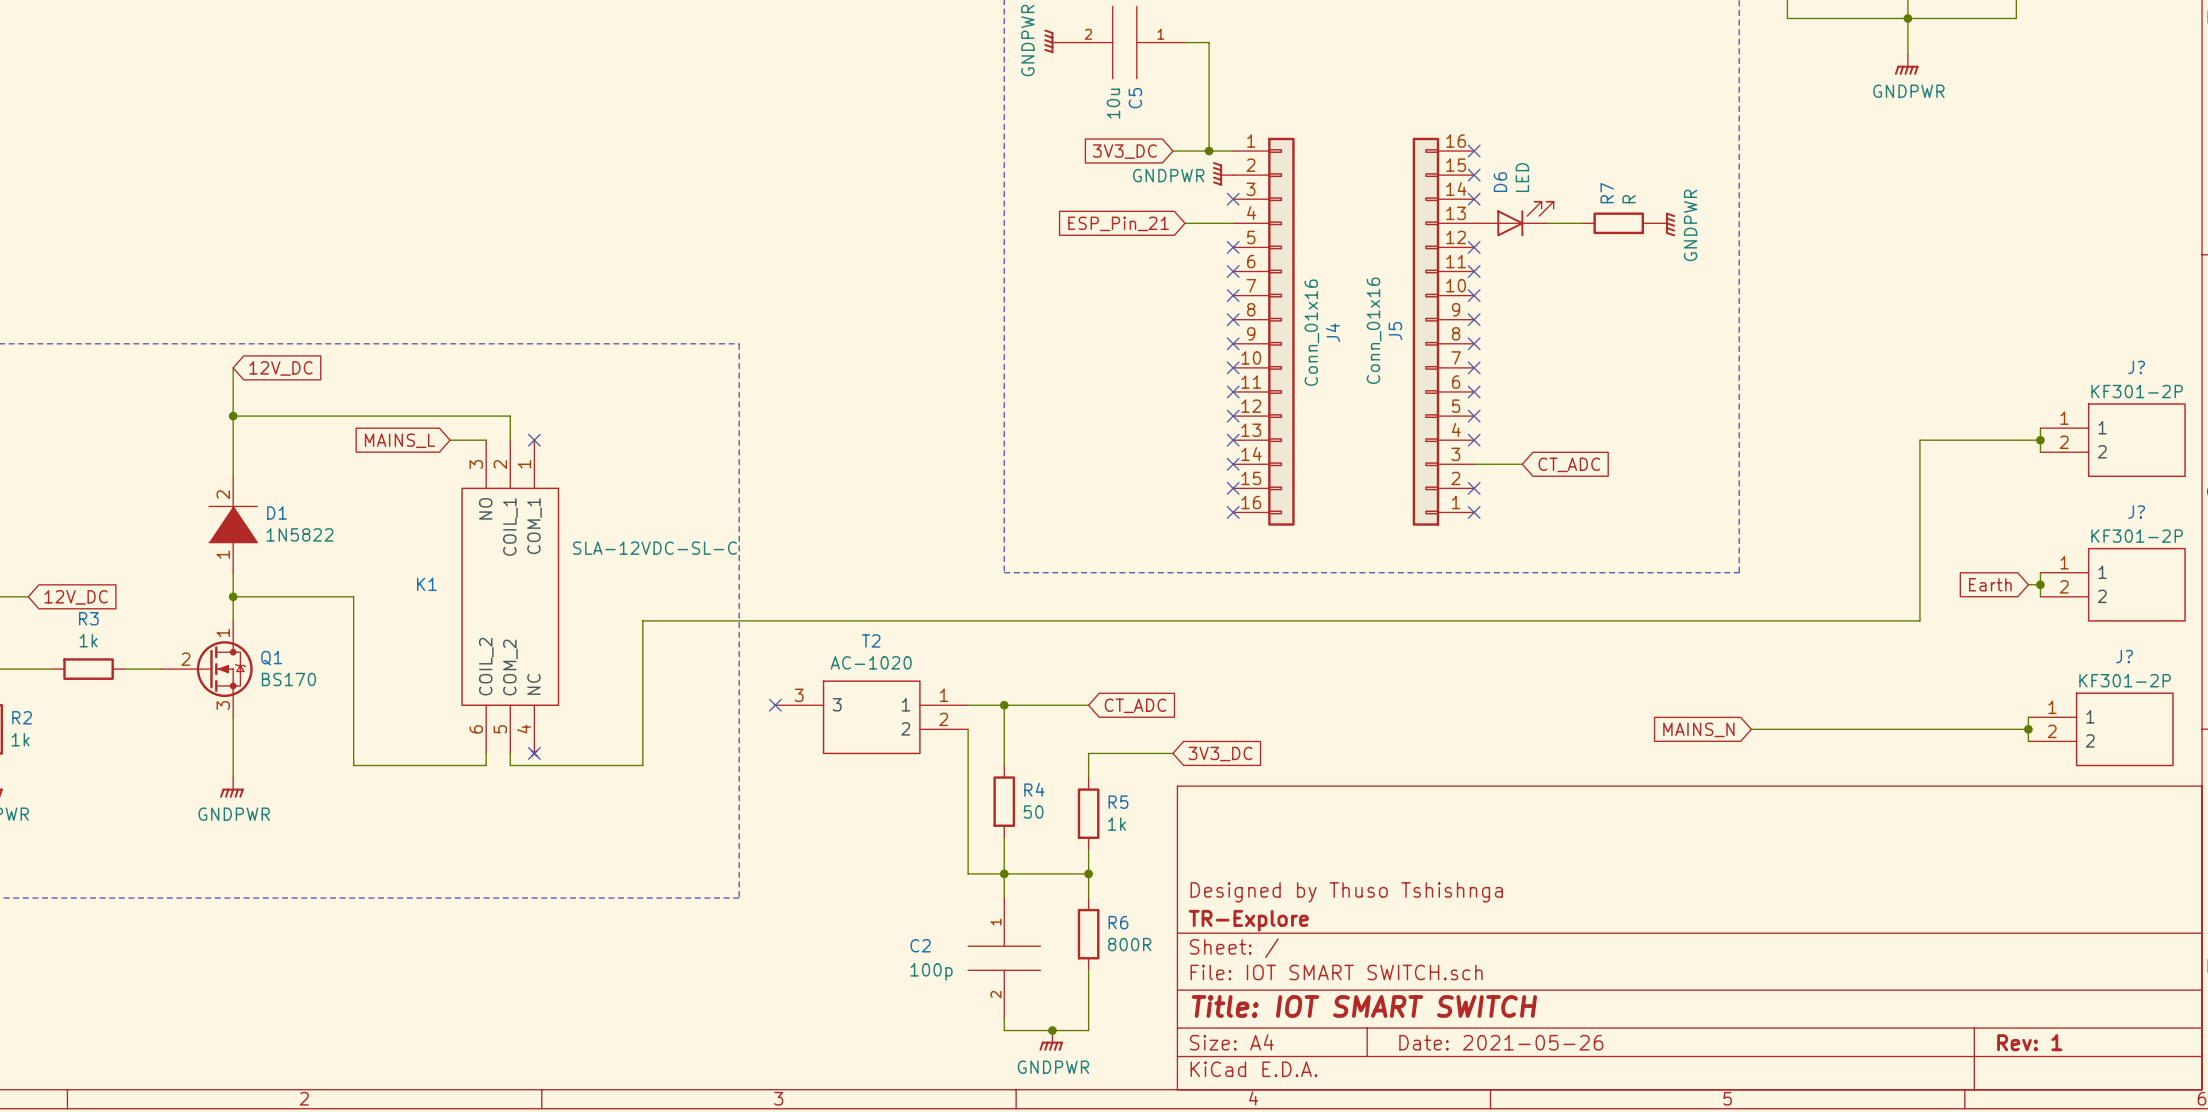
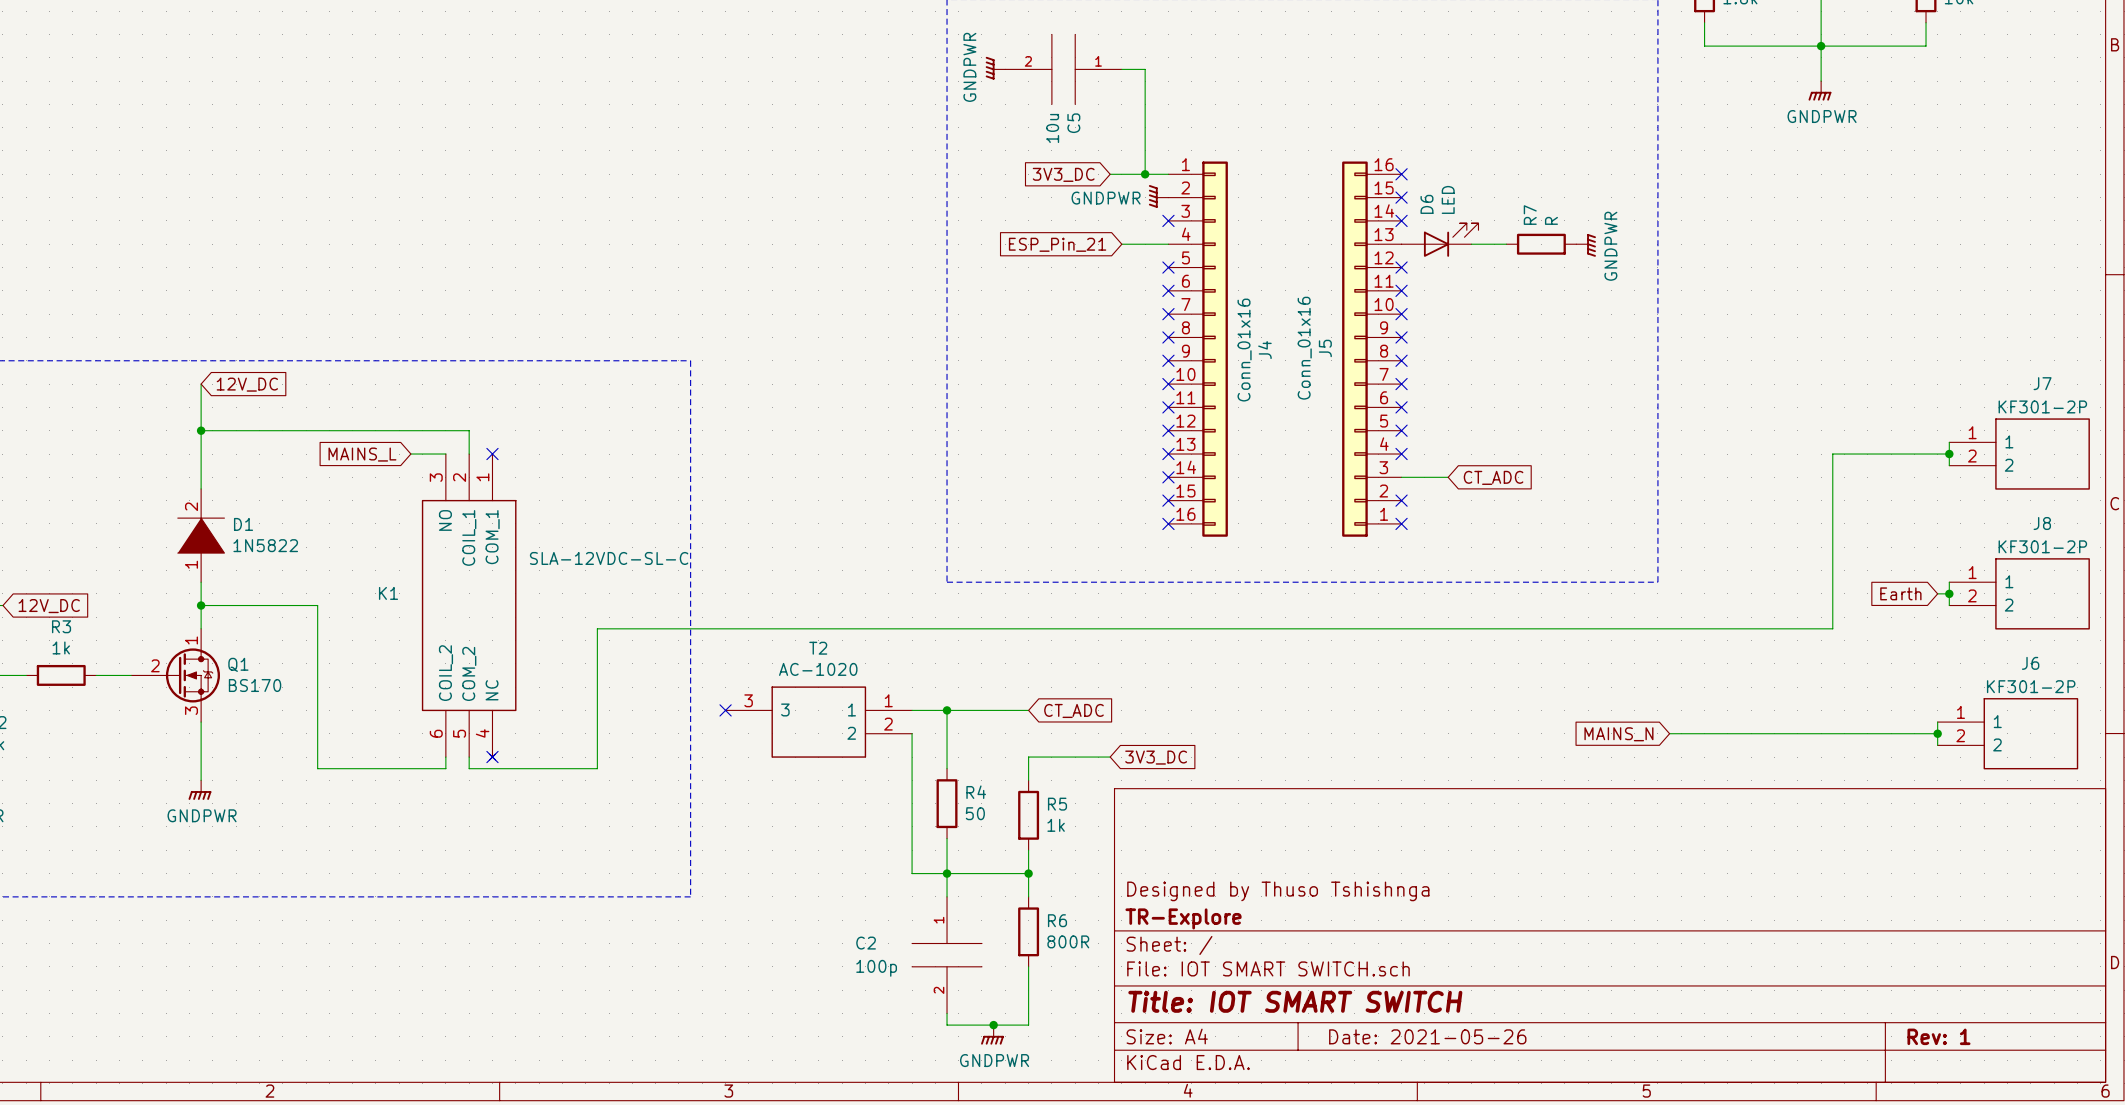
J? name: J? (2136, 367) -> J7 (2042, 383)
J? name: J? (2136, 512) -> J8 (2042, 523)
J? name: J? (2124, 656) -> J6 (2030, 663)

